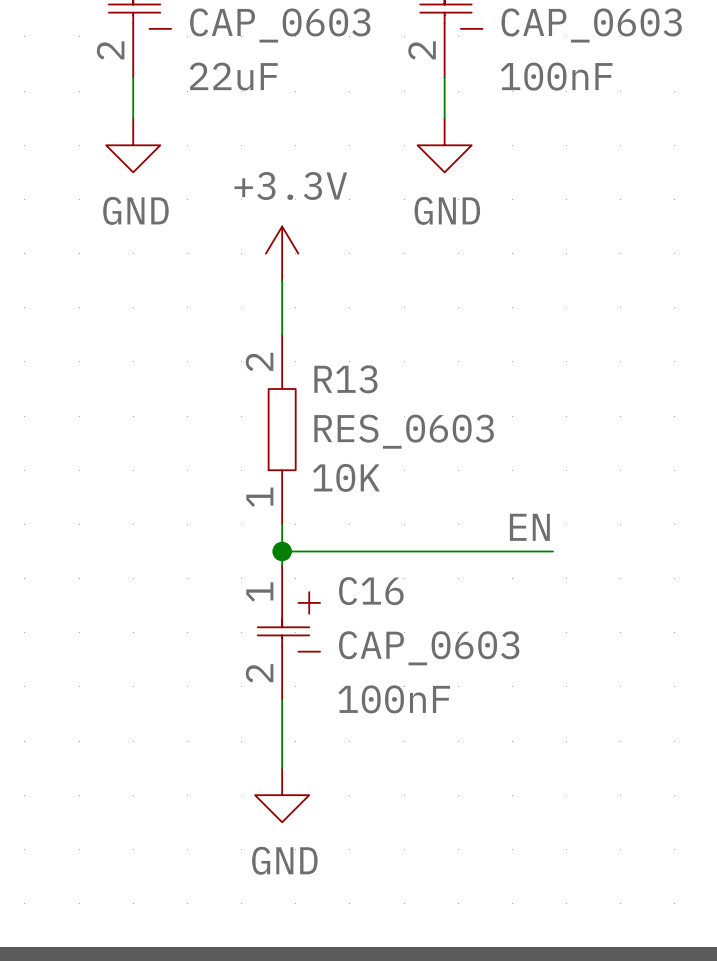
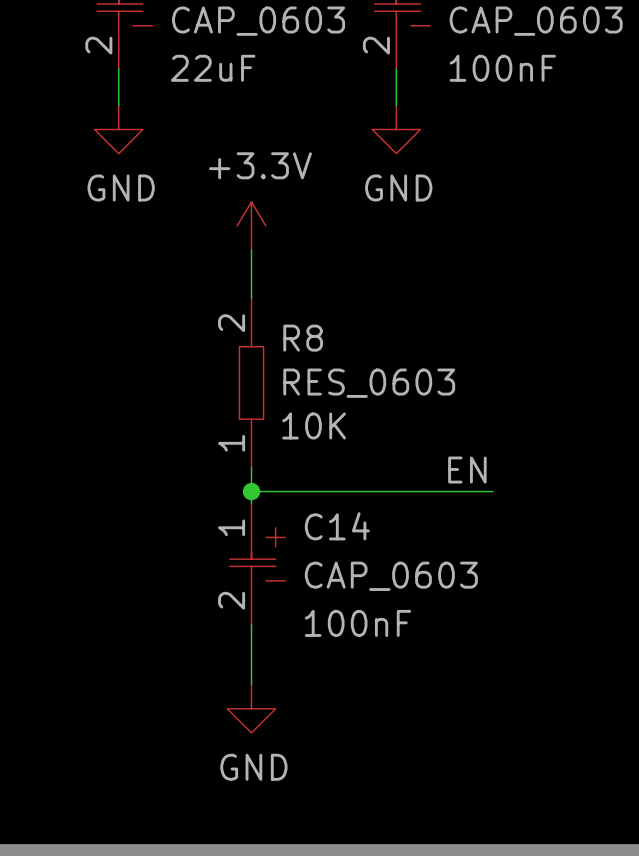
R13 name: R13 (345, 379) -> R8 (303, 338)
C16 name: C16 (371, 591) -> C14 (337, 526)

